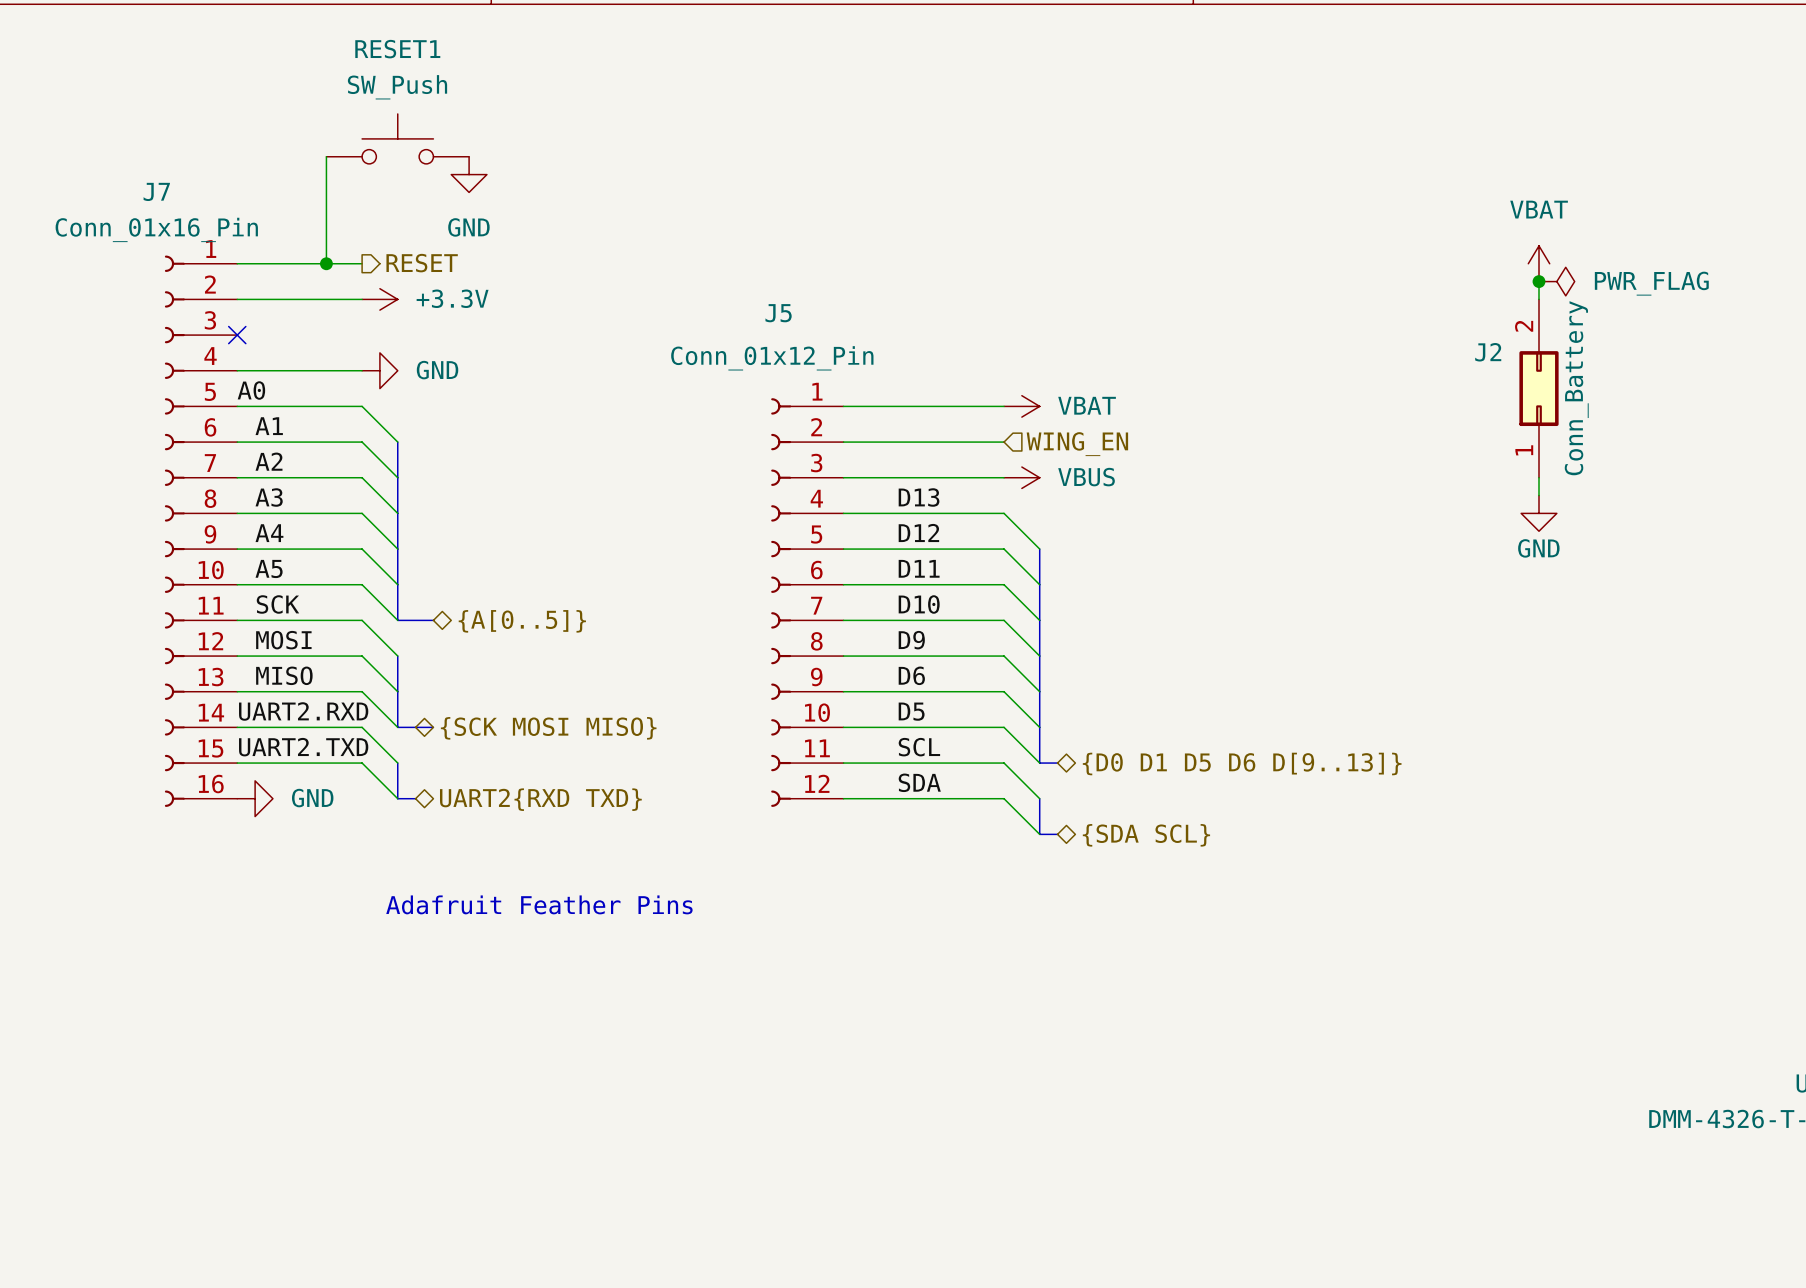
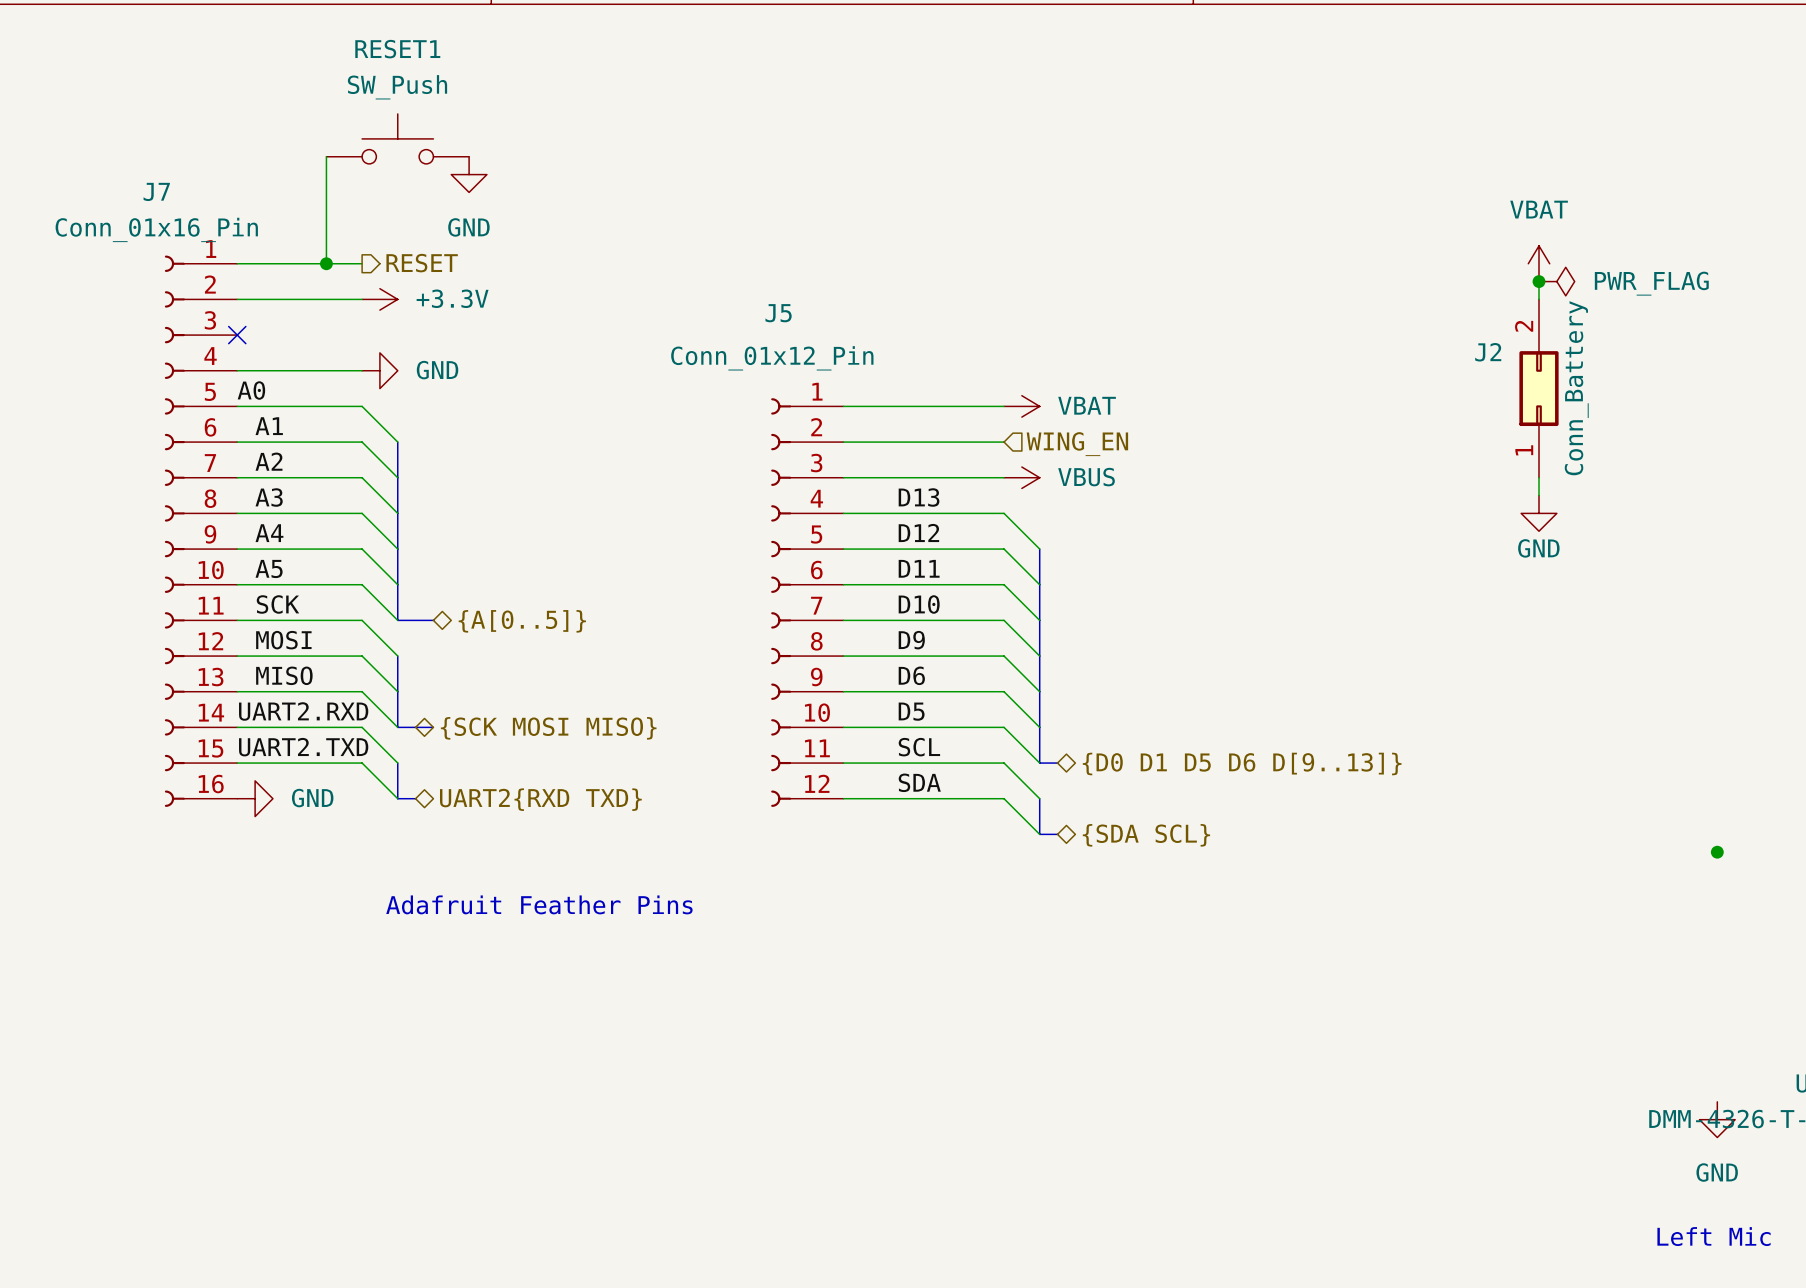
junction: none -> (1717, 852)
power symbol: none -> GND (1717, 1119)
text: none -> Left Mic (1714, 1236)

